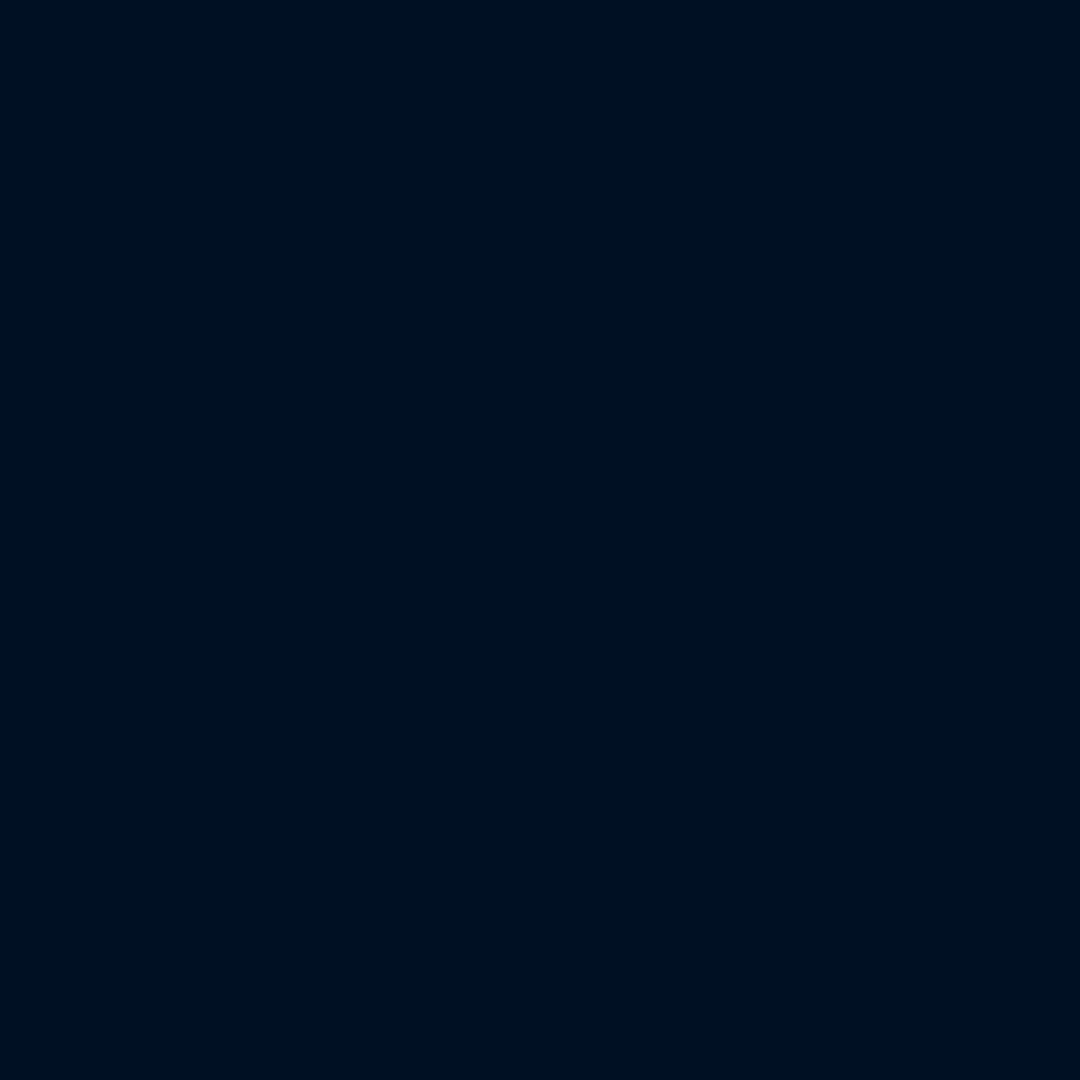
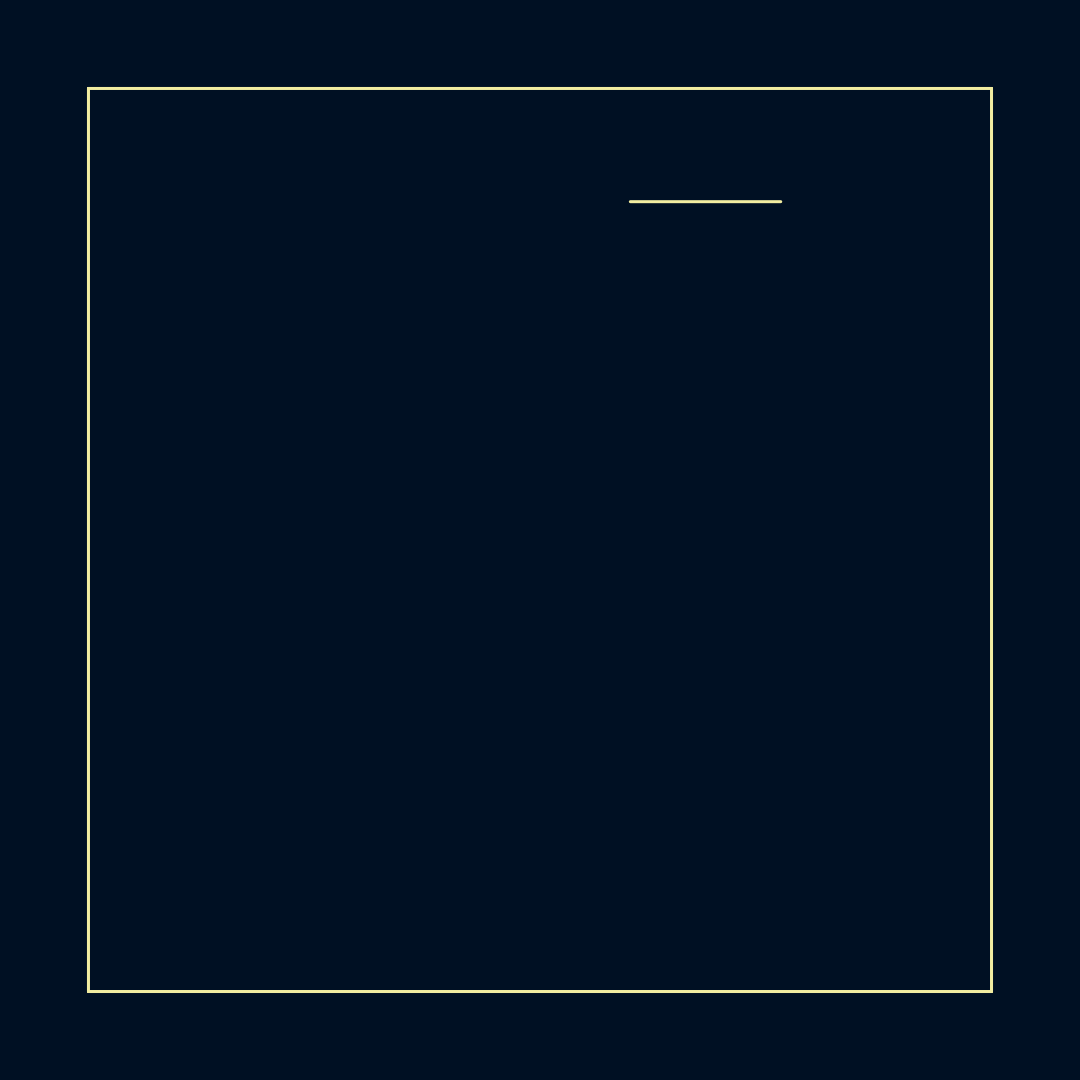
line: none -> (88, 88) (991, 88) (991, 991) (88, 991) (88, 88)
line: none -> (630, 201) (780, 201)

